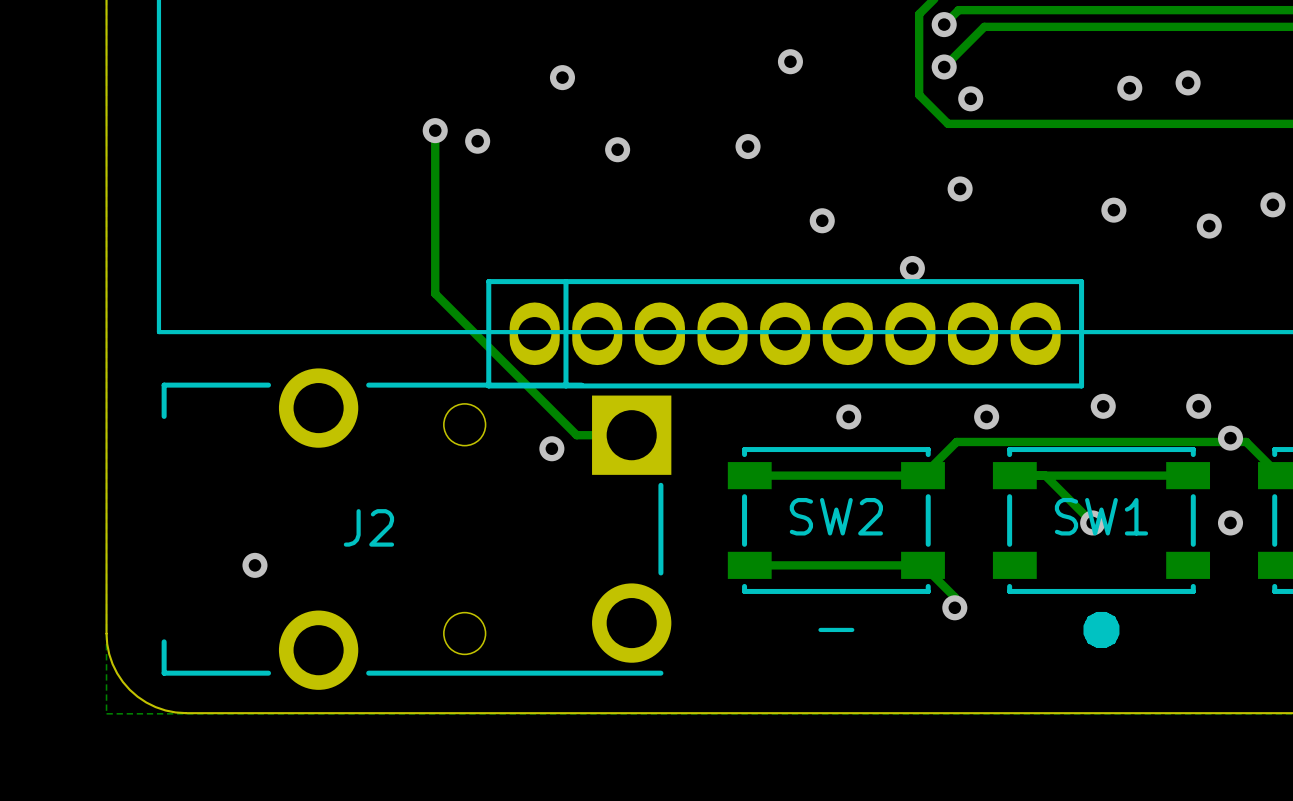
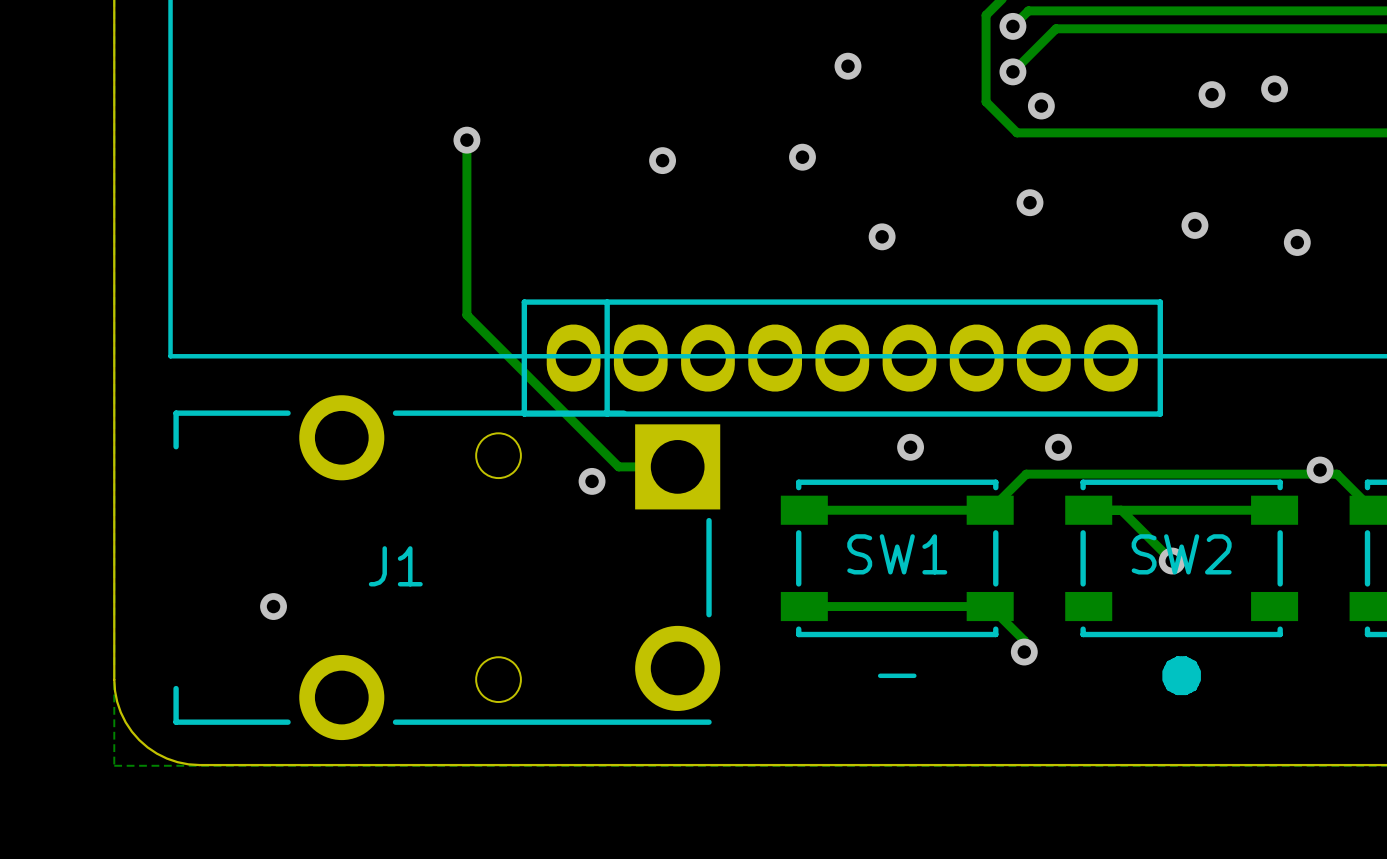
via: (562, 77) -> none
via: (477, 141) -> none
via: (1272, 204) -> none
via: (912, 268) -> none
via: (1103, 406) -> none
via: (1198, 406) -> none
SW2 name: SW2 (836, 516) -> SW1 (897, 554)
SW1 name: SW1 (1101, 516) -> SW2 (1181, 554)
via: (1230, 522) -> none
J2 name: J2 (368, 527) -> J1 (395, 566)

